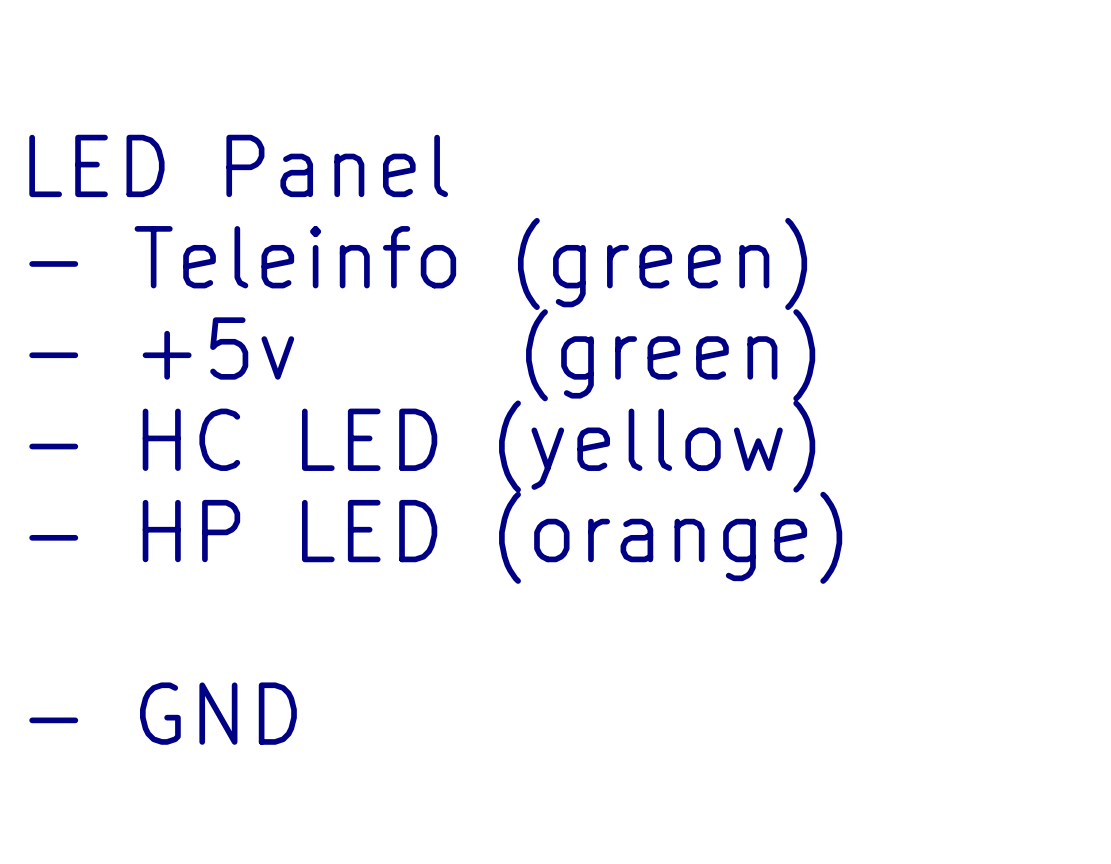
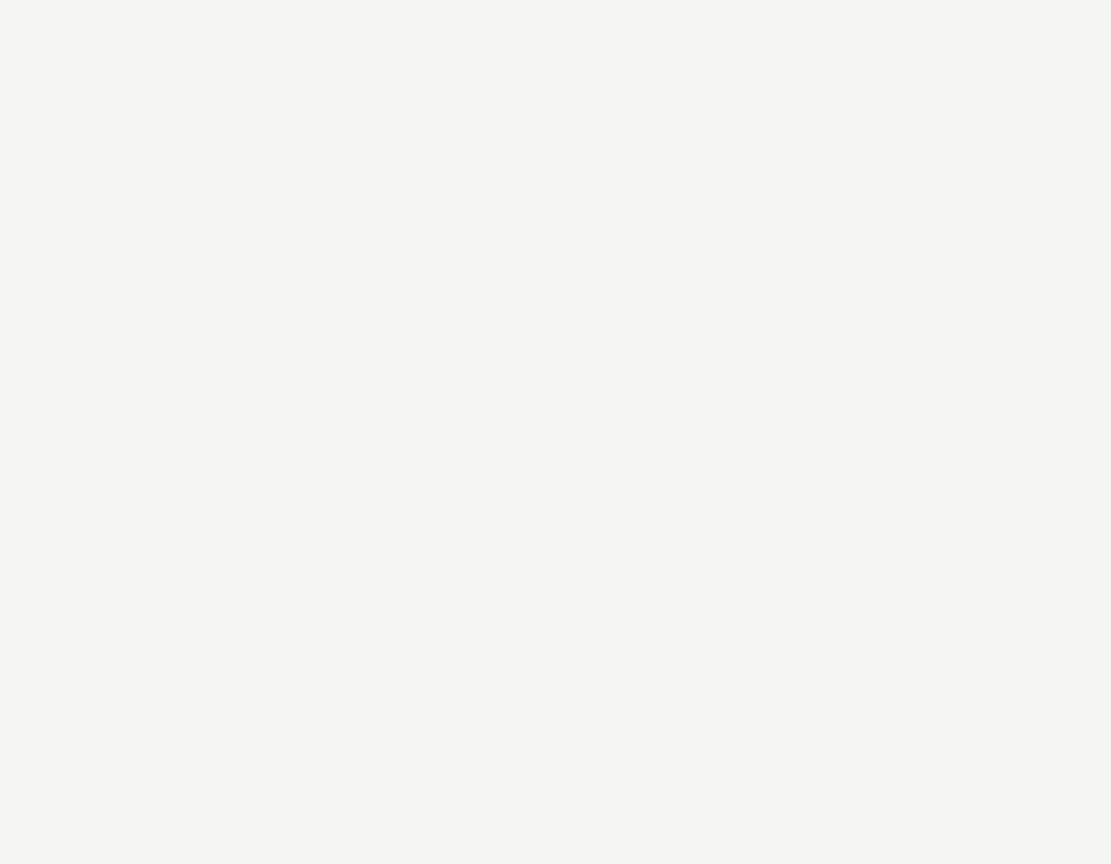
text: LED Panel (238, 165) -> none
text: - Teleinfo (green) (418, 263) -> none
text: - +5v (green) (422, 355) -> none
text: - HC LED (yellow) (422, 446) -> none
text: - HP LED (orange) (435, 537) -> none
text: - GND (163, 713) -> none

